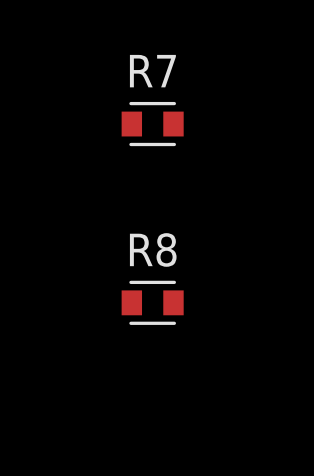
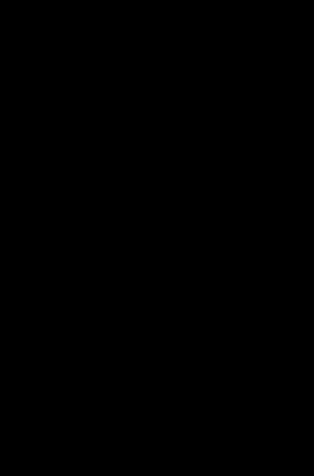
R7: (152, 124) -> none
R8: (152, 302) -> none

